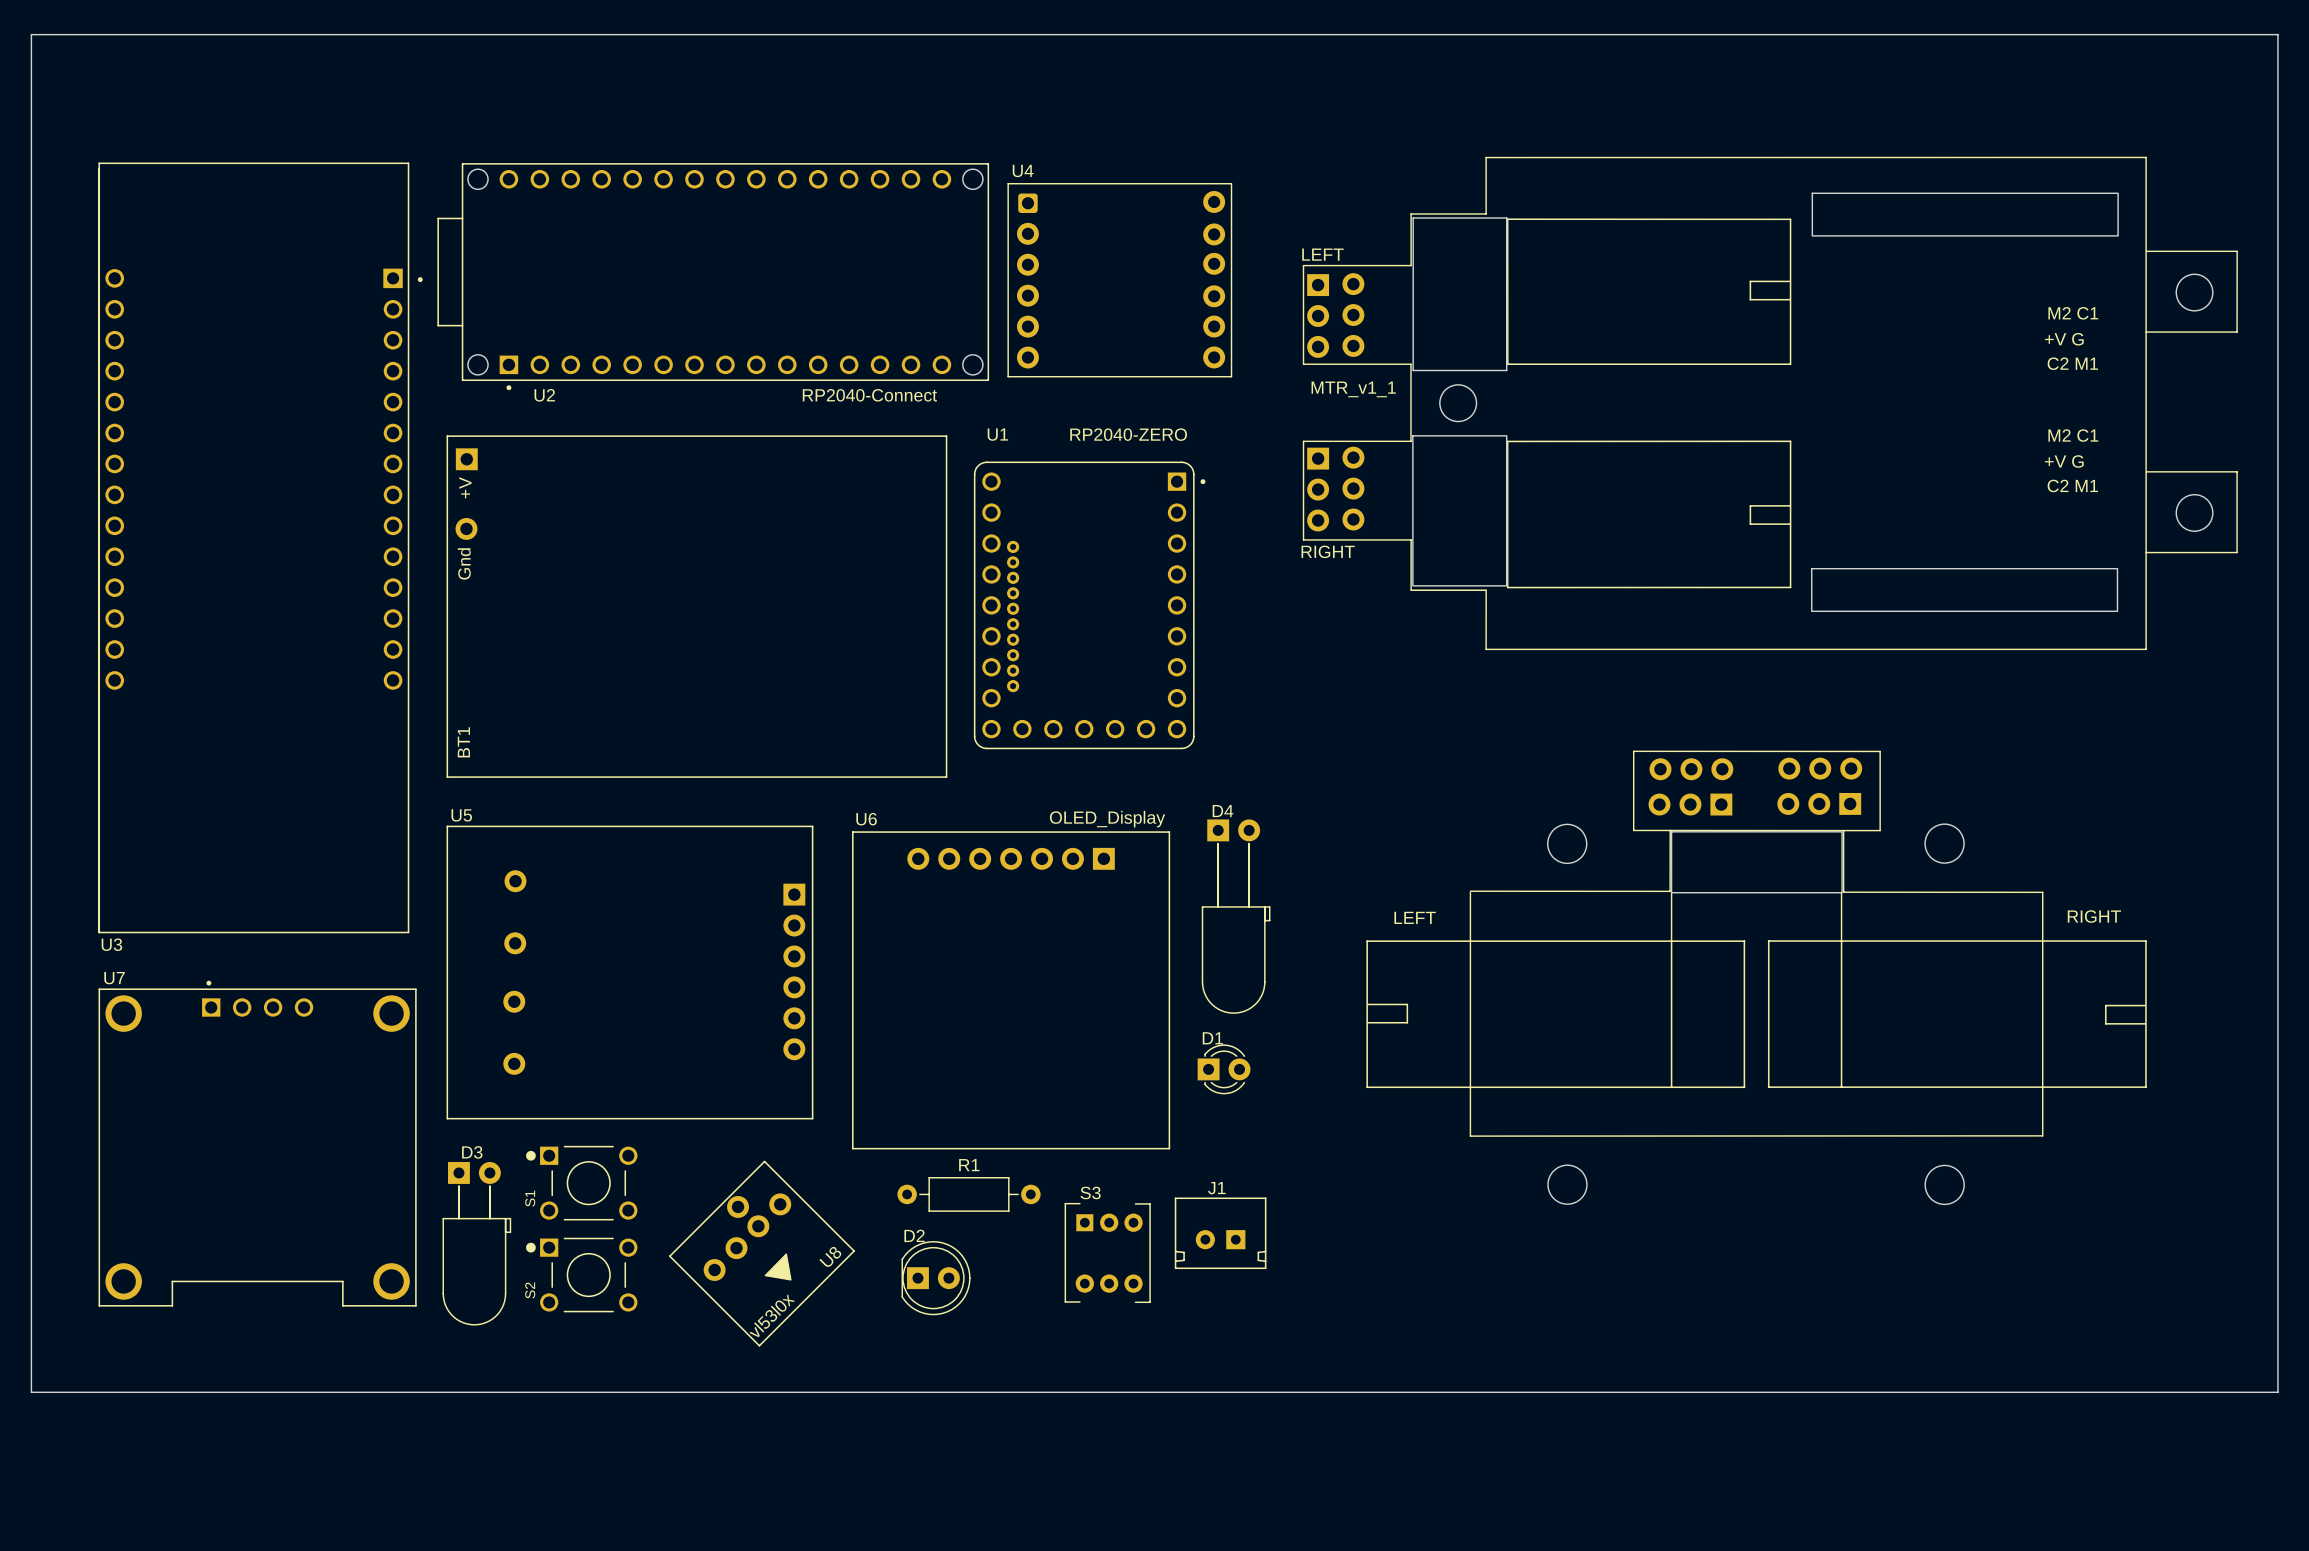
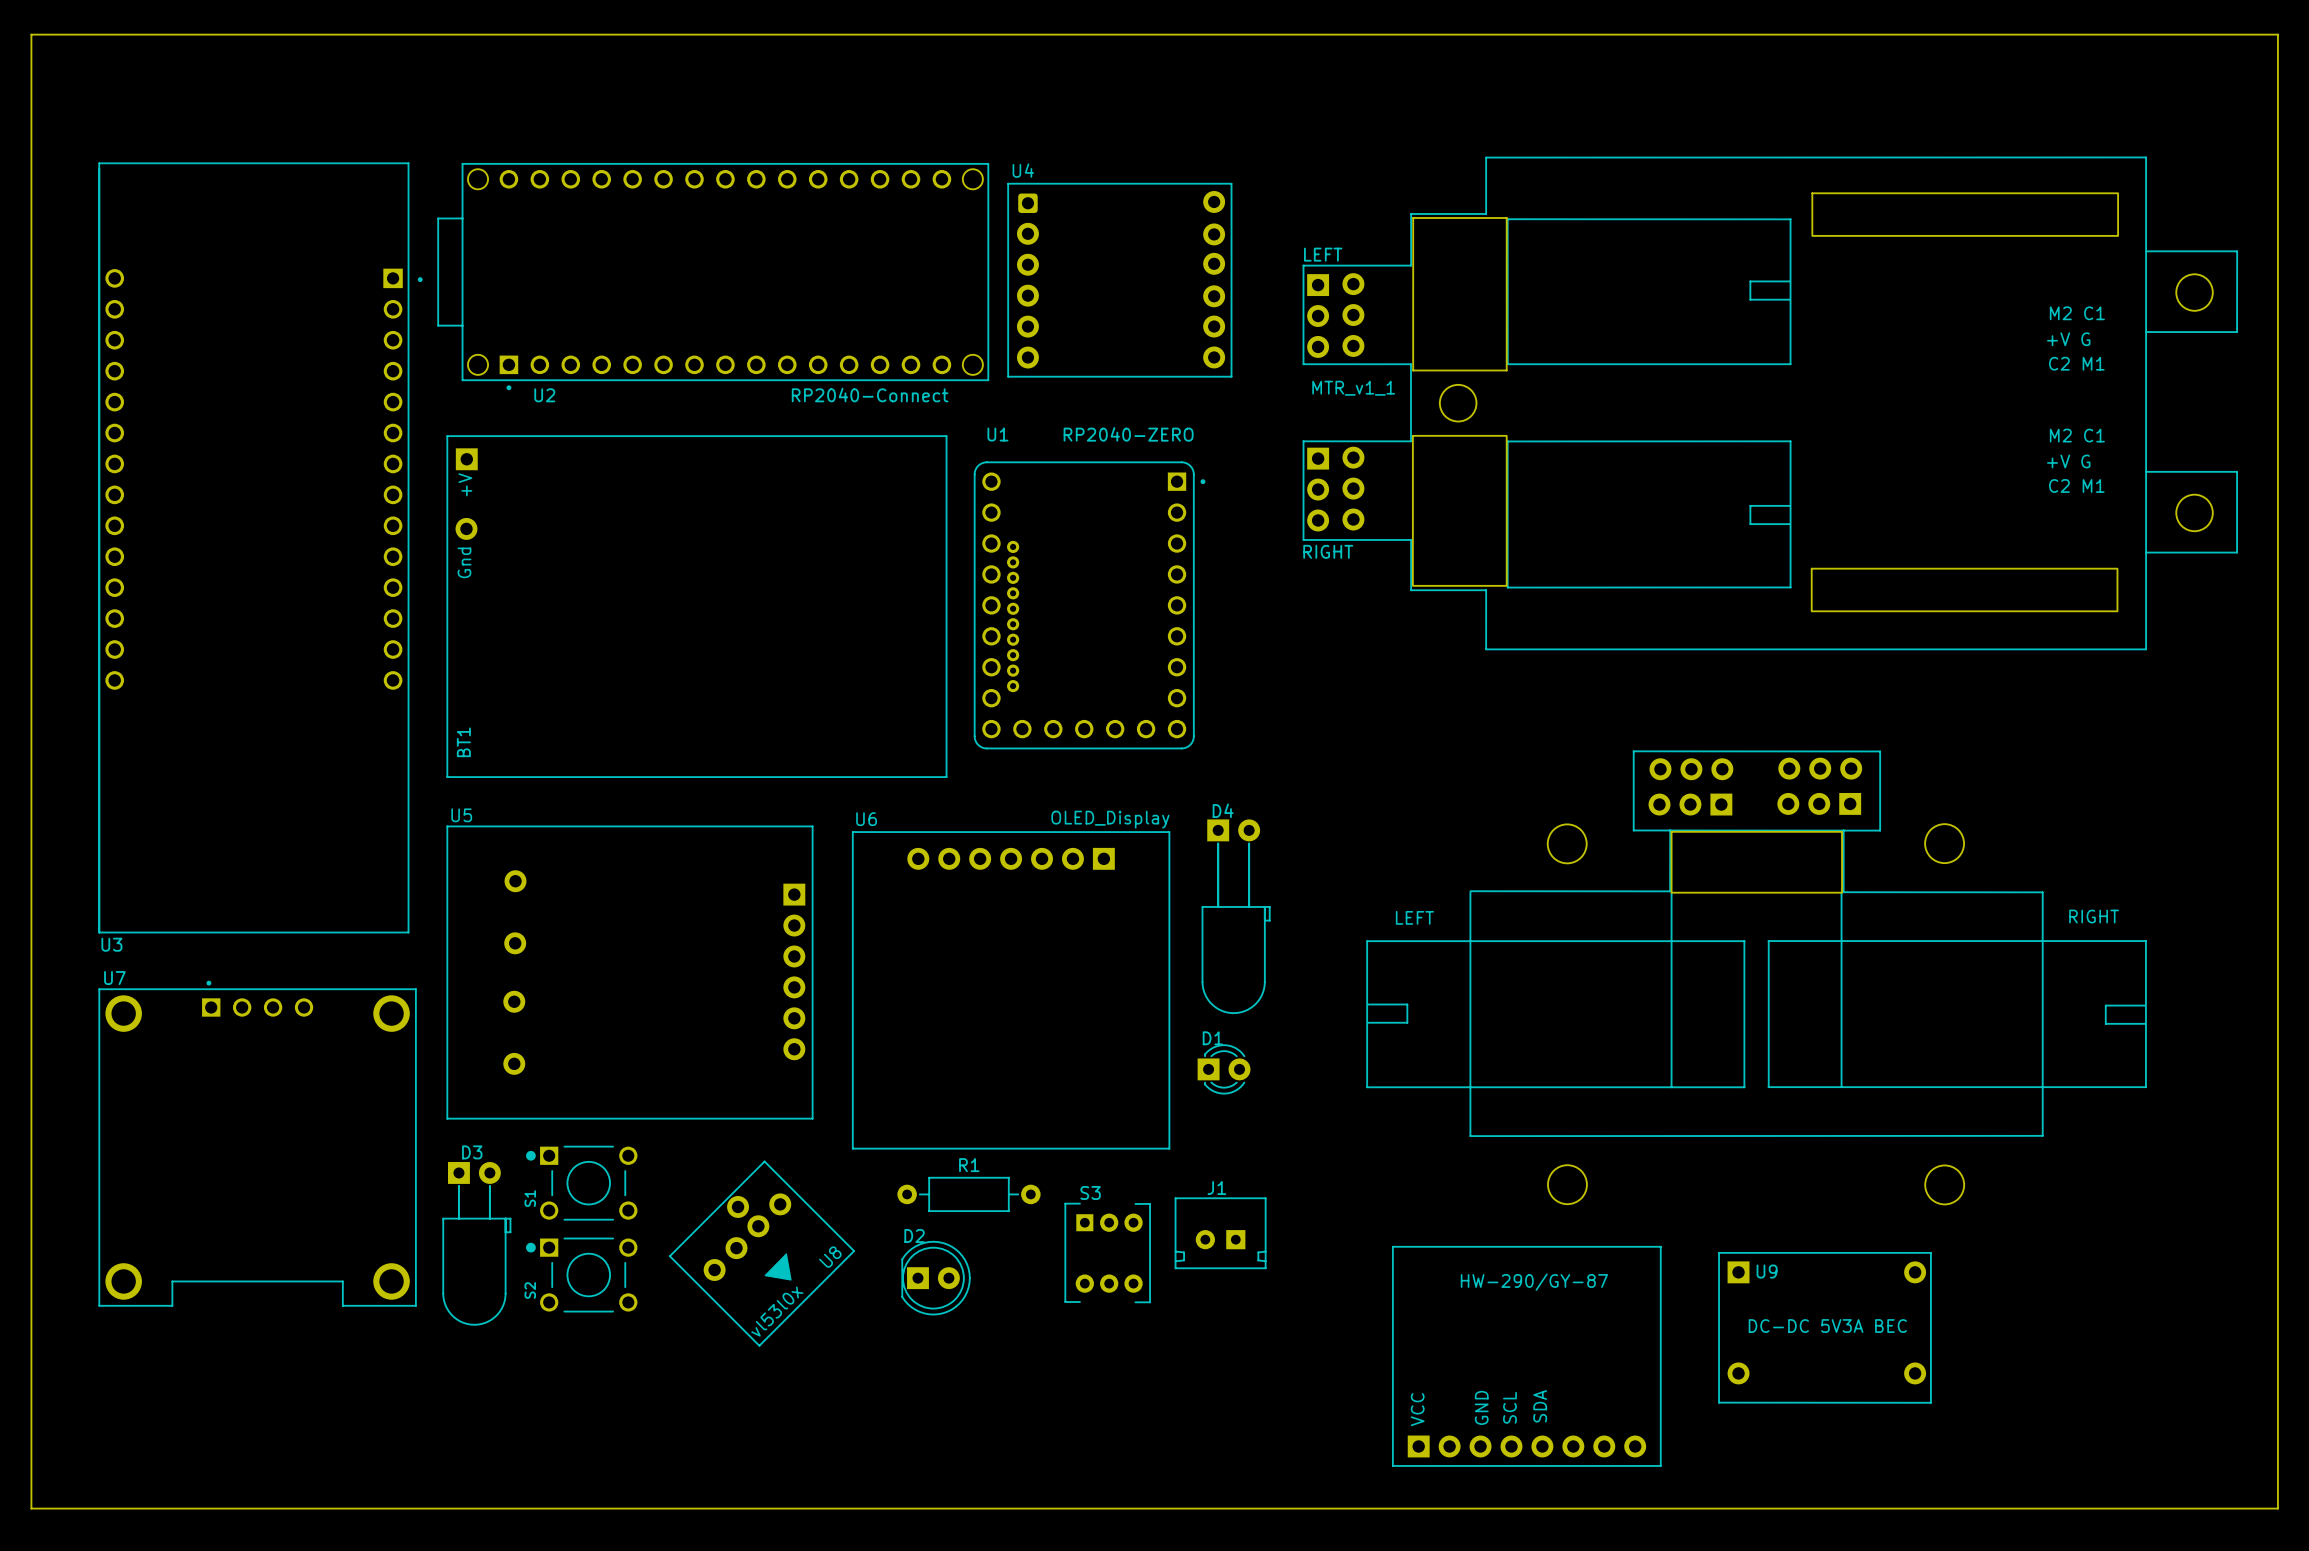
U9: none -> (1824, 1327)
part: none -> (1526, 1356)
board edge: (31, 1392) (2277, 1392) -> (31, 1392) (31, 1508) (2277, 1508) (2277, 1392)

